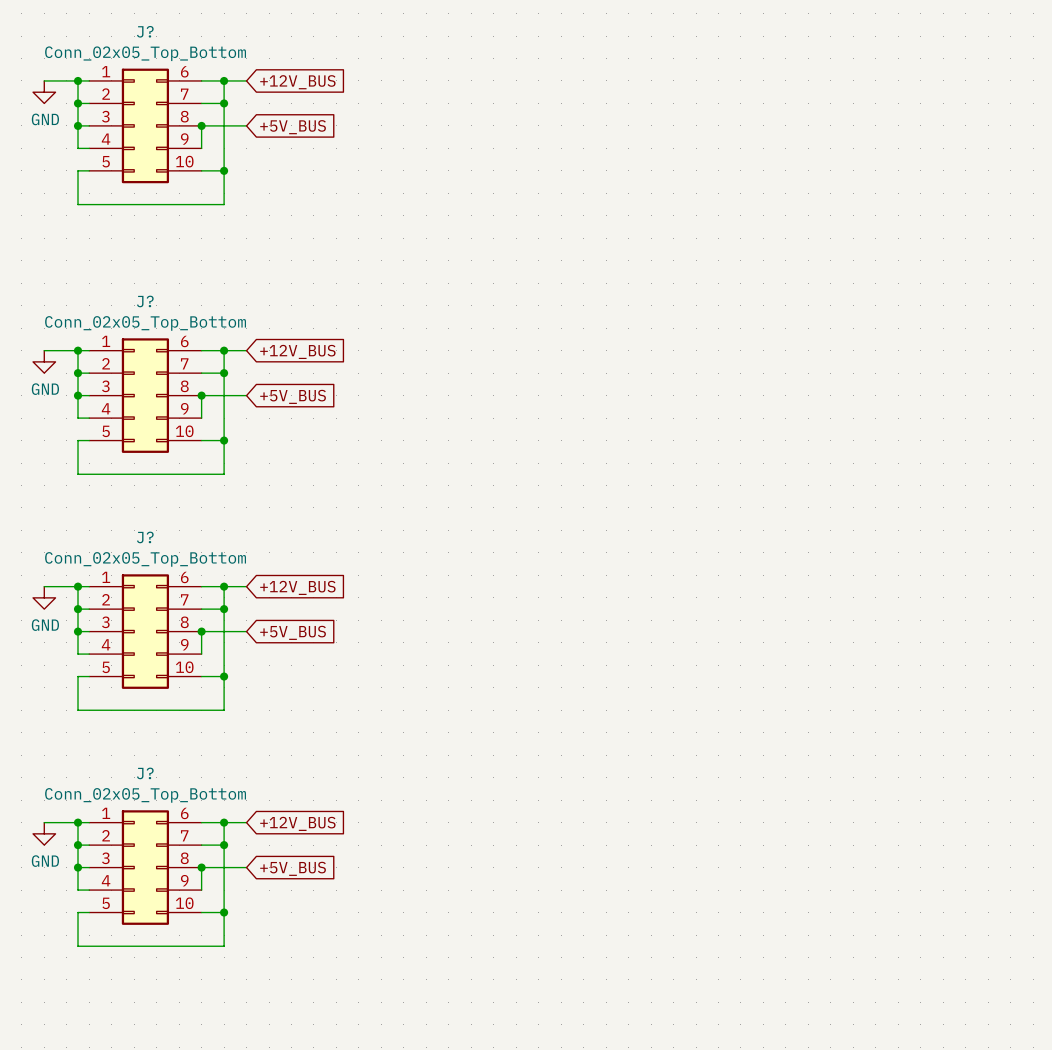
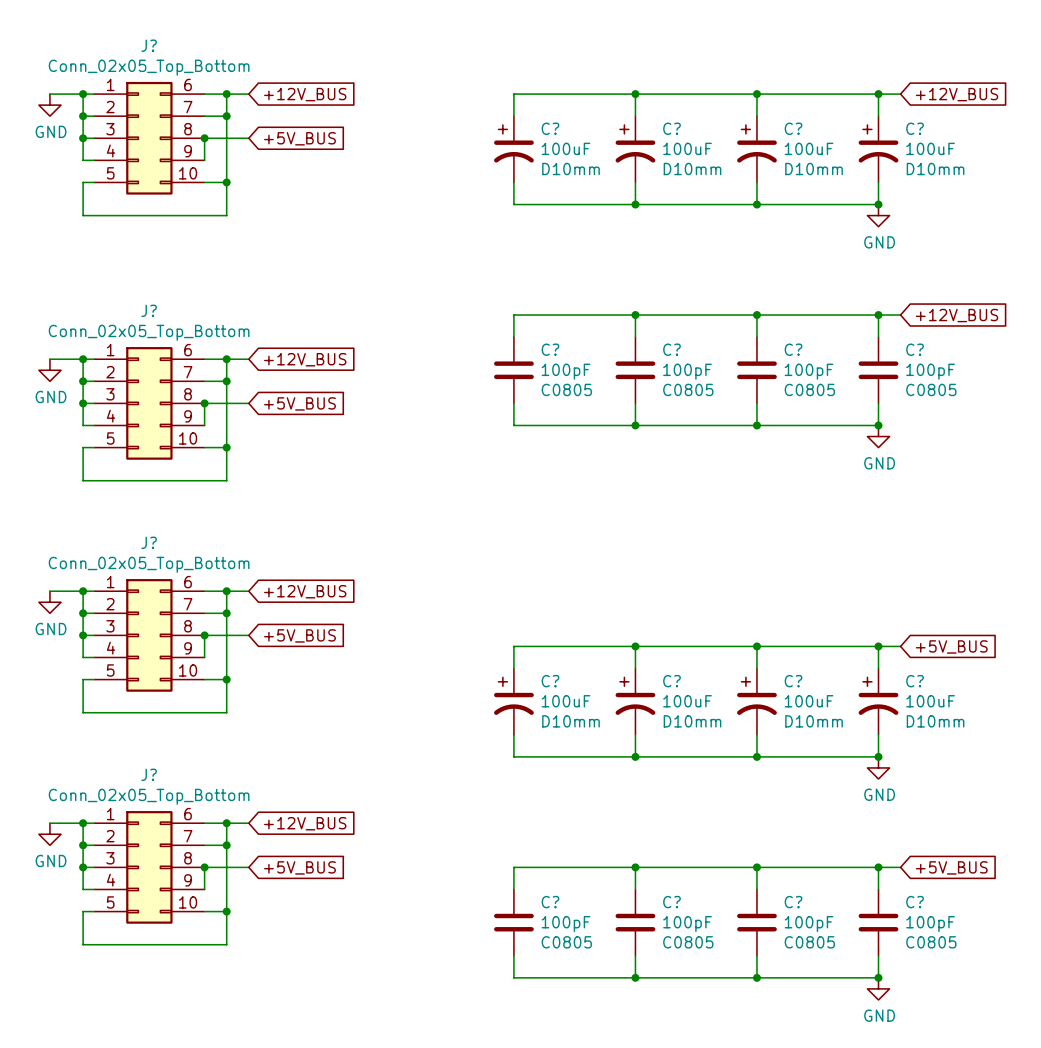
wire: none -> (635, 94) (635, 116)
junction: none -> (635, 94)
wire: none -> (756, 94) (756, 116)
junction: none -> (756, 94)
wire: none -> (878, 94) (878, 116)
junction: none -> (878, 94)
wire: none -> (900, 94) (513, 94) (513, 116)
global label: none -> +12V_BUS (957, 94)
C?: none -> 100uF (513, 149)
C?: none -> 100uF (635, 149)
C?: none -> 100uF (756, 149)
C?: none -> 100uF (878, 149)
wire: none -> (513, 182) (513, 204) (878, 204) (878, 182)
wire: none -> (635, 182) (635, 204)
wire: none -> (756, 182) (756, 204)
junction: none -> (635, 204)
junction: none -> (756, 204)
junction: none -> (878, 204)
power symbol: none -> GND (878, 215)
wire: none -> (635, 315) (635, 337)
junction: none -> (635, 315)
wire: none -> (756, 315) (756, 337)
junction: none -> (756, 315)
wire: none -> (878, 315) (878, 337)
junction: none -> (878, 315)
wire: none -> (900, 315) (513, 315) (513, 337)
global label: none -> +12V_BUS (957, 315)
C?: none -> 100pF (513, 370)
C?: none -> 100pF (635, 370)
C?: none -> 100pF (756, 370)
C?: none -> 100pF (878, 370)
wire: none -> (513, 403) (513, 425) (878, 425) (878, 403)
wire: none -> (635, 403) (635, 425)
wire: none -> (756, 403) (756, 425)
junction: none -> (635, 425)
junction: none -> (756, 425)
junction: none -> (878, 425)
power symbol: none -> GND (878, 436)
wire: none -> (635, 646) (635, 668)
junction: none -> (635, 646)
wire: none -> (756, 646) (756, 668)
junction: none -> (756, 646)
wire: none -> (878, 646) (878, 668)
junction: none -> (878, 646)
wire: none -> (900, 646) (513, 646) (513, 668)
global label: none -> +5V_BUS (951, 646)
C?: none -> 100uF (513, 701)
C?: none -> 100uF (635, 701)
C?: none -> 100uF (756, 701)
C?: none -> 100uF (878, 701)
wire: none -> (513, 734) (513, 756) (878, 756) (878, 734)
wire: none -> (635, 734) (635, 756)
wire: none -> (756, 734) (756, 756)
junction: none -> (635, 756)
junction: none -> (756, 756)
junction: none -> (878, 756)
power symbol: none -> GND (878, 767)
wire: none -> (635, 867) (635, 889)
junction: none -> (635, 867)
wire: none -> (756, 867) (756, 889)
junction: none -> (756, 867)
wire: none -> (878, 867) (878, 889)
junction: none -> (878, 867)
wire: none -> (900, 867) (513, 867) (513, 889)
global label: none -> +5V_BUS (951, 867)
C?: none -> 100pF (513, 922)
C?: none -> 100pF (635, 922)
C?: none -> 100pF (756, 922)
C?: none -> 100pF (878, 922)
wire: none -> (513, 955) (513, 977) (878, 977) (878, 955)
wire: none -> (635, 955) (635, 977)
wire: none -> (756, 955) (756, 977)
junction: none -> (635, 977)
junction: none -> (756, 977)
junction: none -> (878, 977)
power symbol: none -> GND (878, 988)

